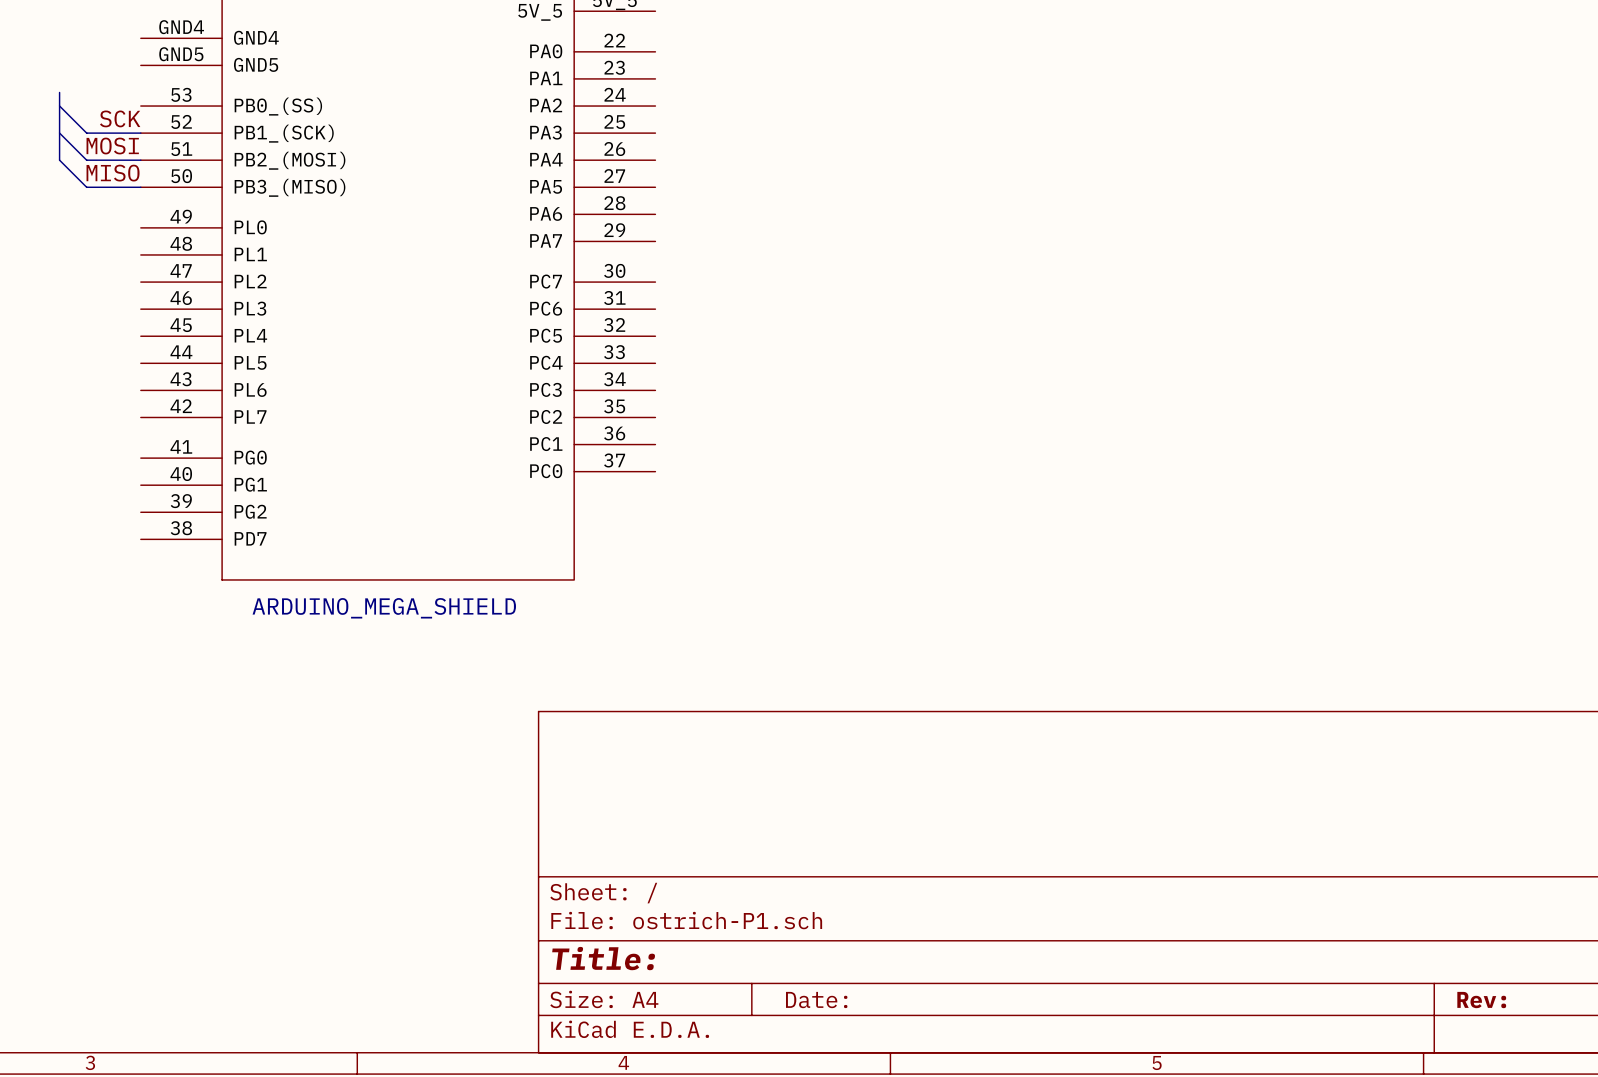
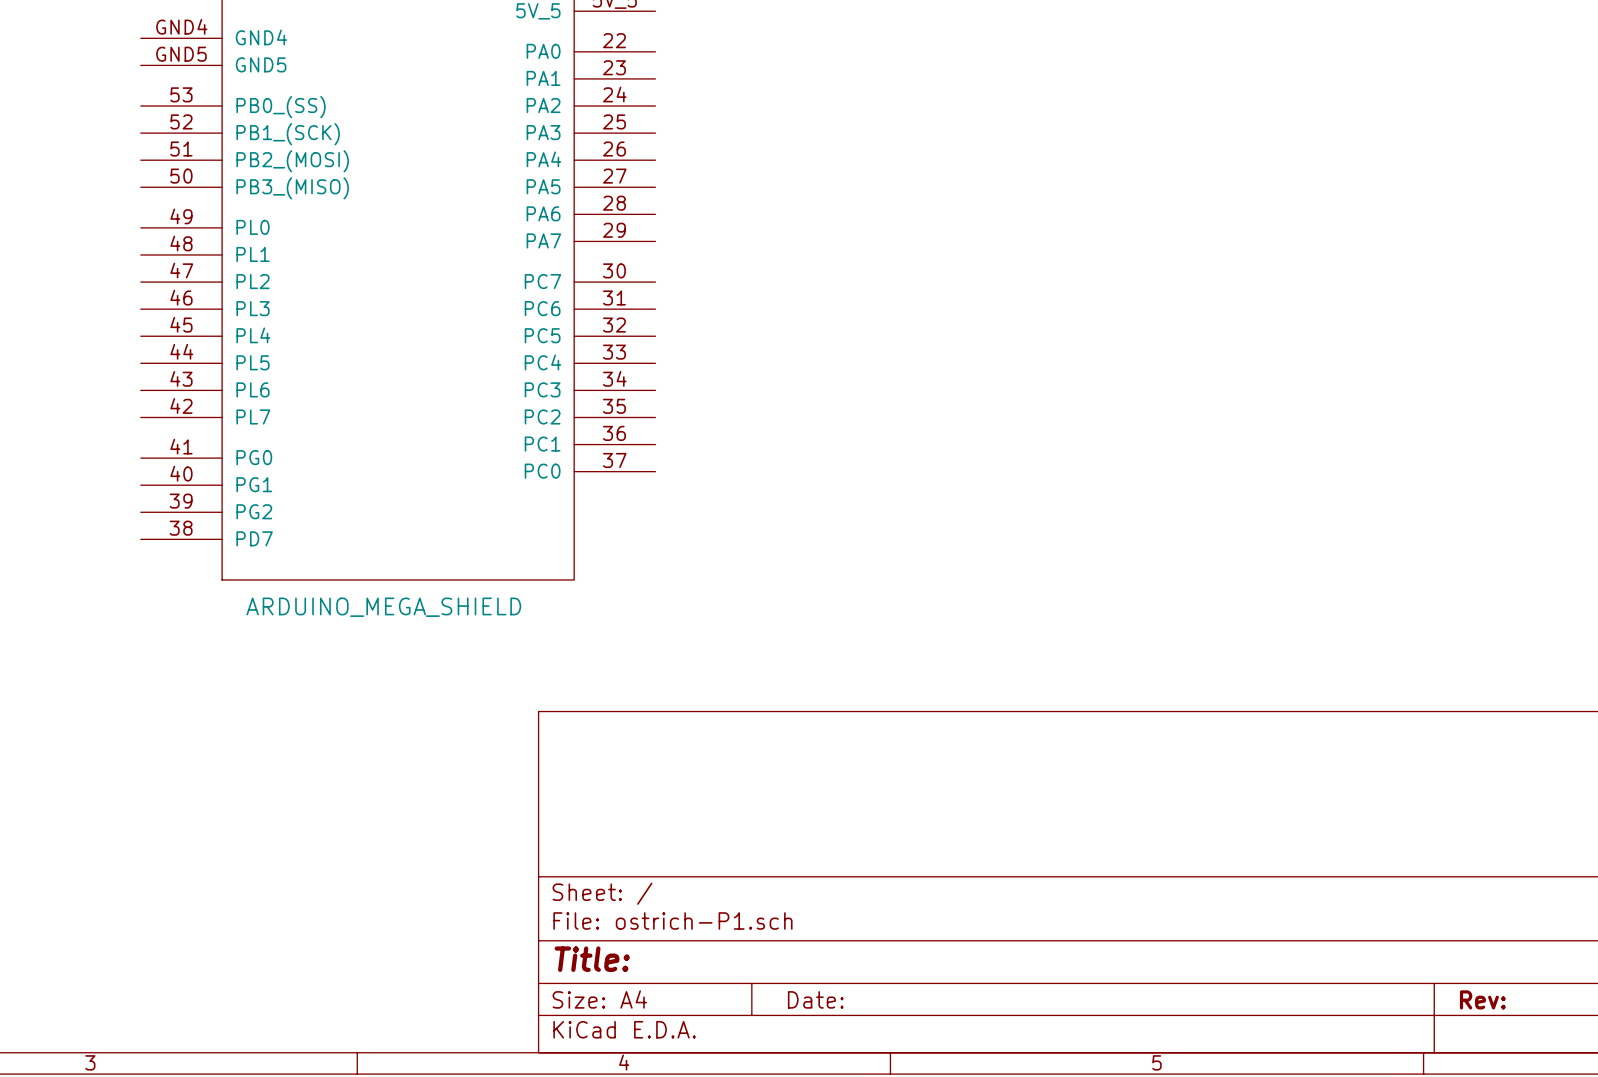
bus: (59, 92) (59, 160) -> none
wire: (59, 106) (86, 133) (140, 133) -> none
label: SCK (120, 118) -> none
wire: (59, 133) (86, 160) (140, 160) -> none
label: MOSI (112, 146) -> none
wire: (59, 160) (86, 187) (140, 187) -> none
label: MISO (113, 173) -> none

